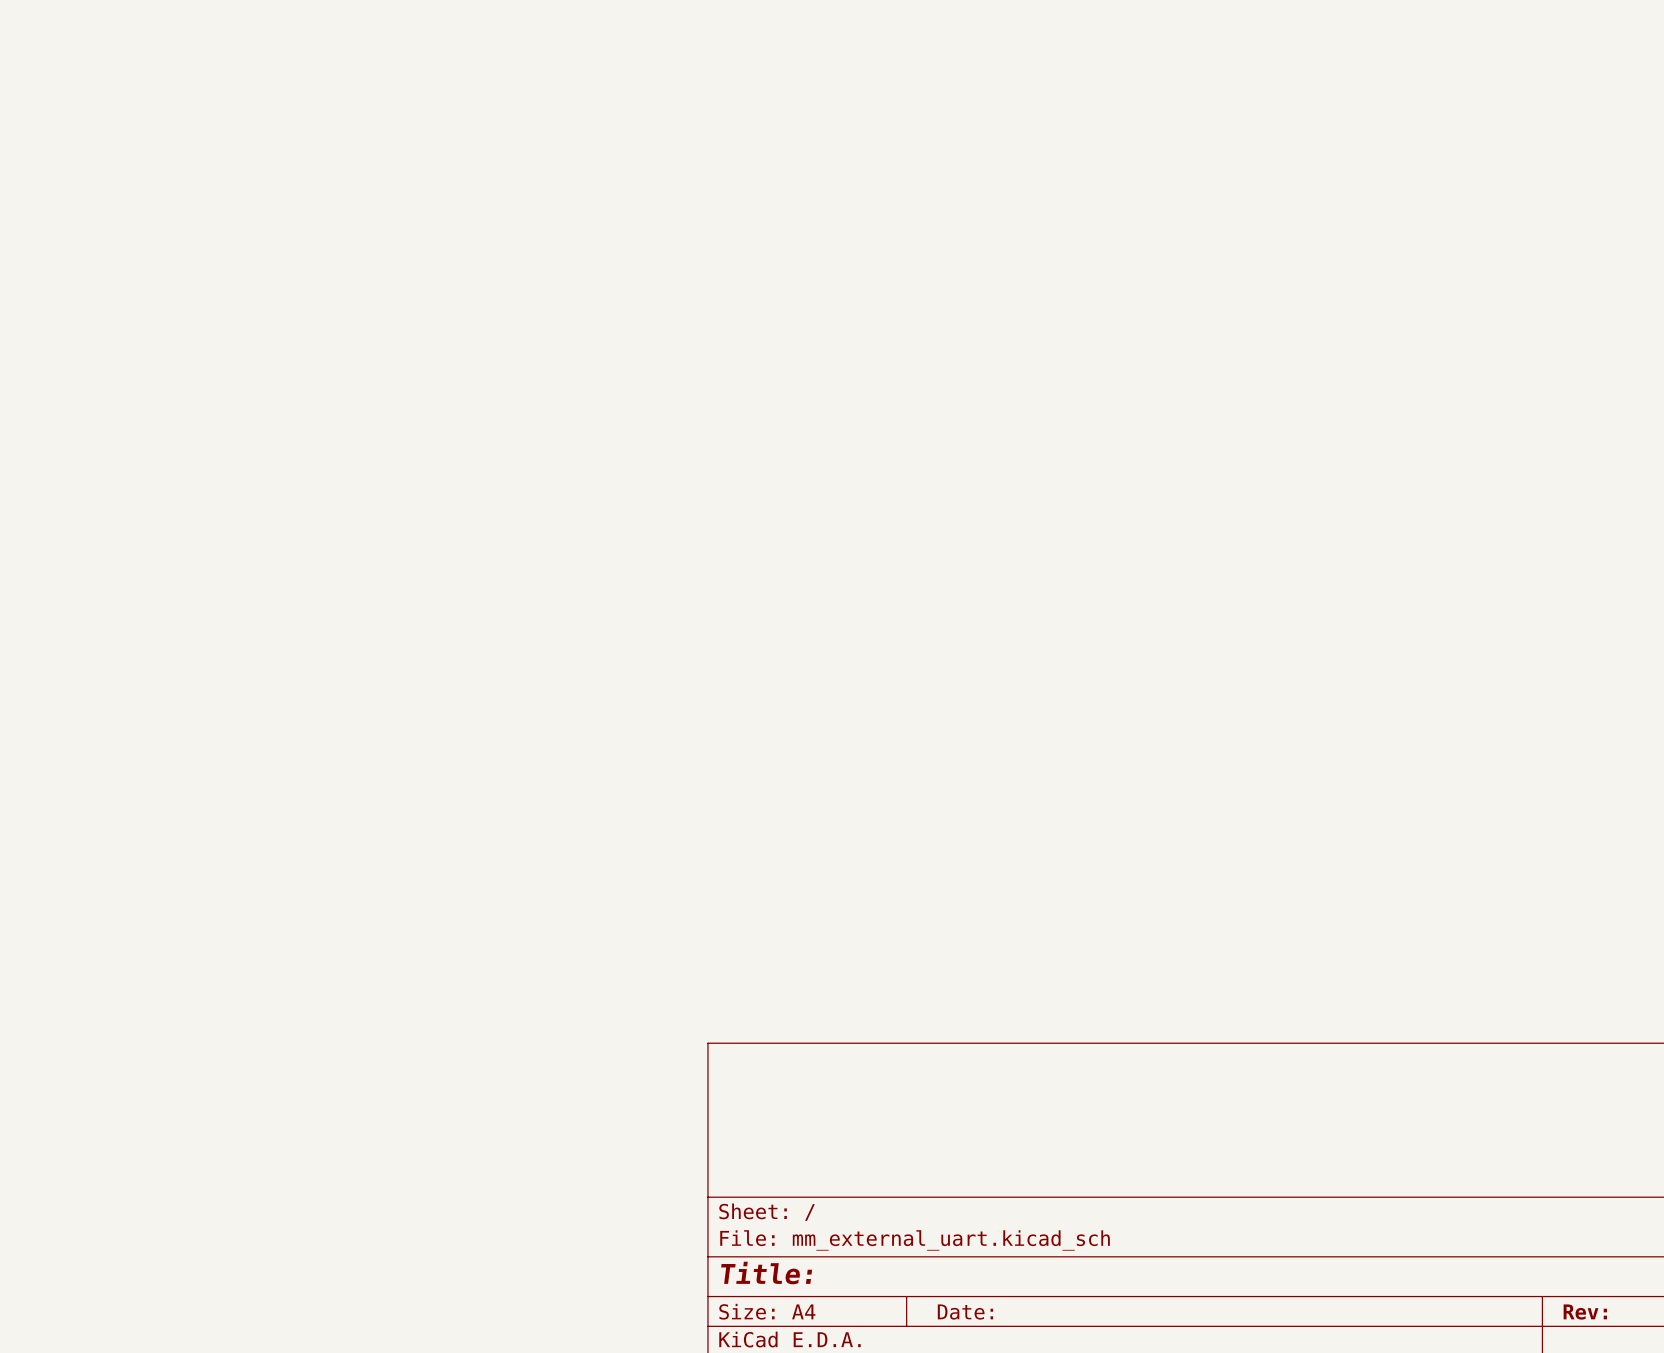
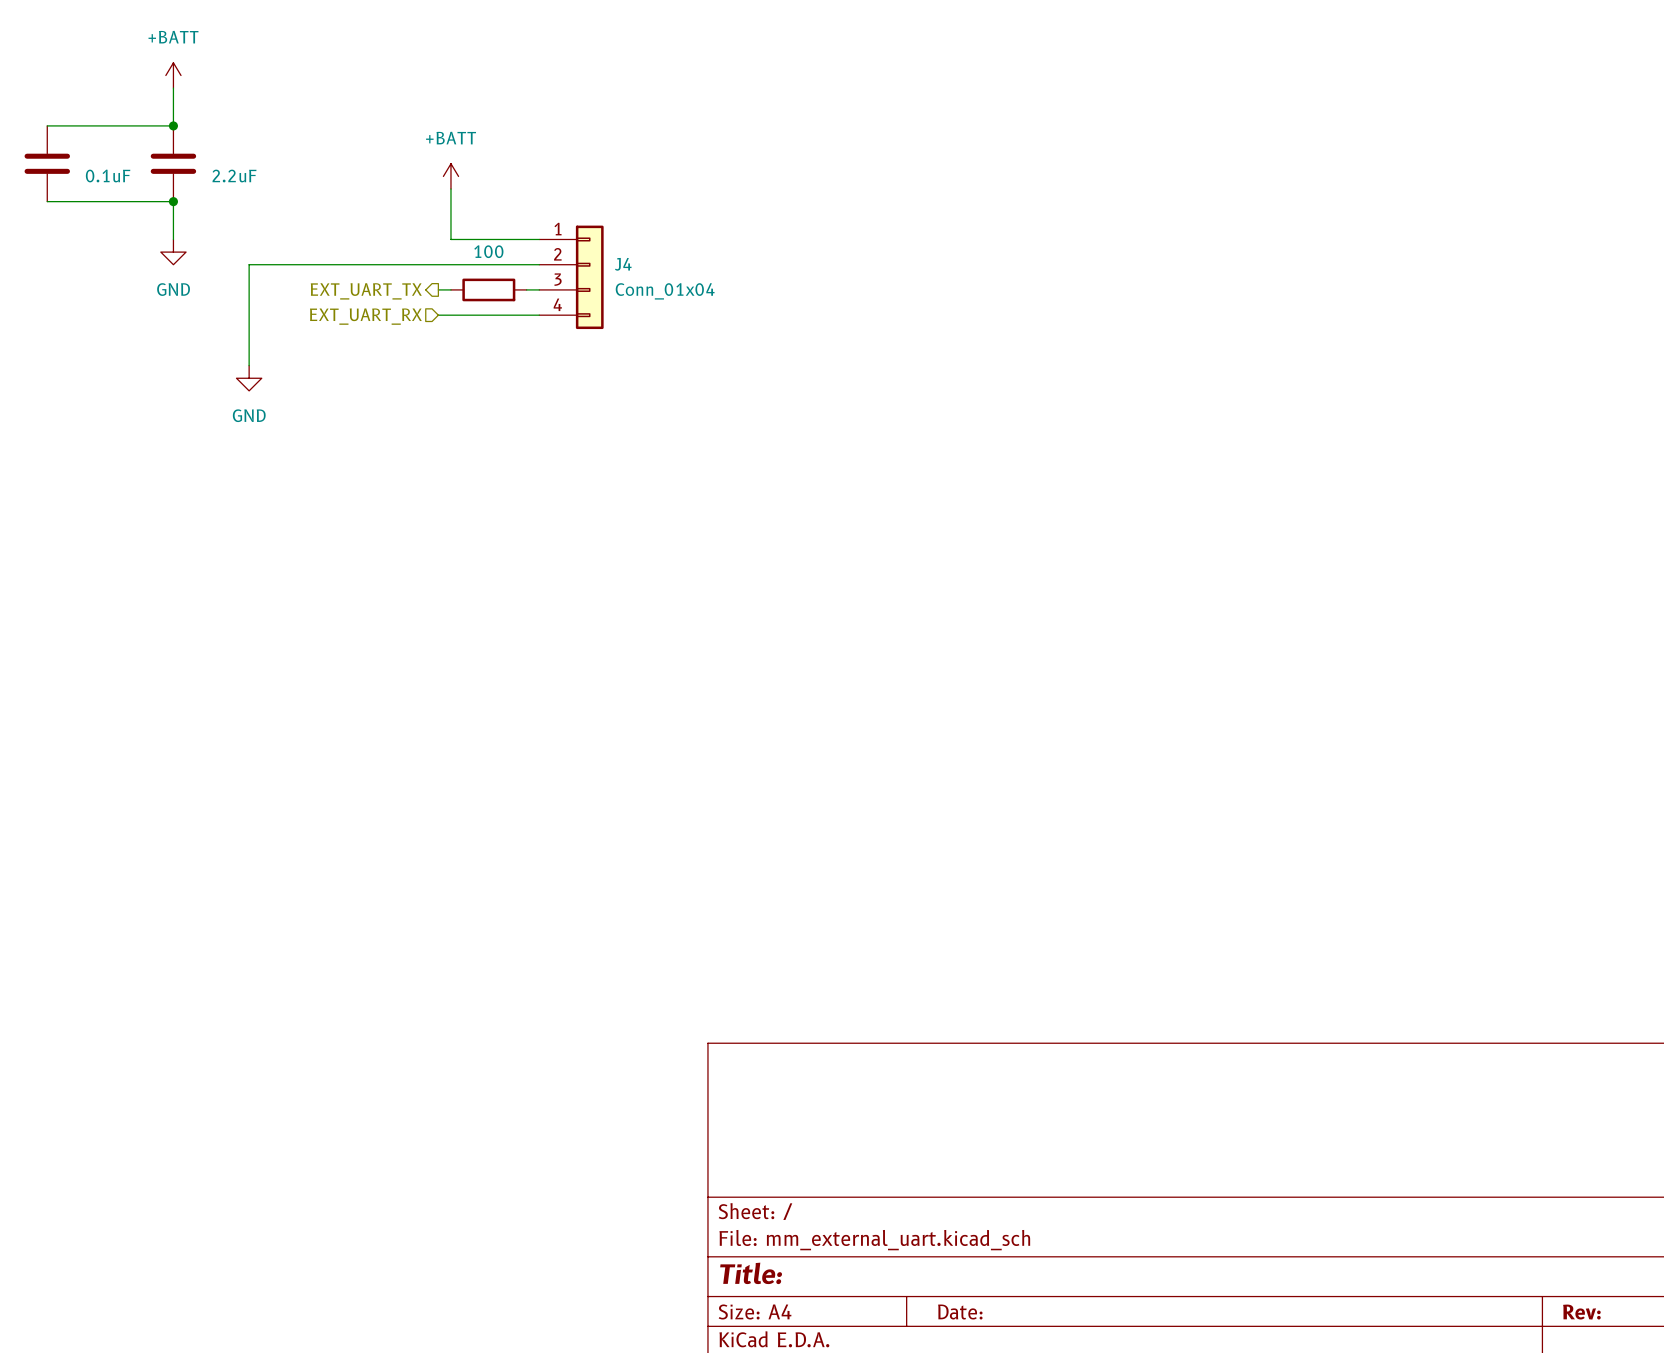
power symbol: none -> +BATT (173, 75)
wire: none -> (173, 88) (173, 125) (47, 125)
junction: none -> (173, 125)
part: none -> 0.1uF (47, 163)
part: none -> 2.2uF (173, 163)
power symbol: none -> +BATT (450, 176)
wire: none -> (450, 189) (450, 239) (539, 239)
wire: none -> (47, 201) (173, 201) (173, 239)
junction: none -> (173, 201)
power symbol: none -> GND (173, 252)
wire: none -> (539, 264) (249, 264) (249, 365)
J4: none -> Conn_01x04 (571, 277)
wire: none -> (438, 289) (450, 289)
part: none -> 100 (488, 289)
wire: none -> (526, 289) (539, 289)
hierarchical label: none -> EXT_UART_TX (366, 291)
wire: none -> (438, 315) (539, 315)
hierarchical label: none -> EXT_UART_RX (365, 316)
power symbol: none -> GND (249, 378)

